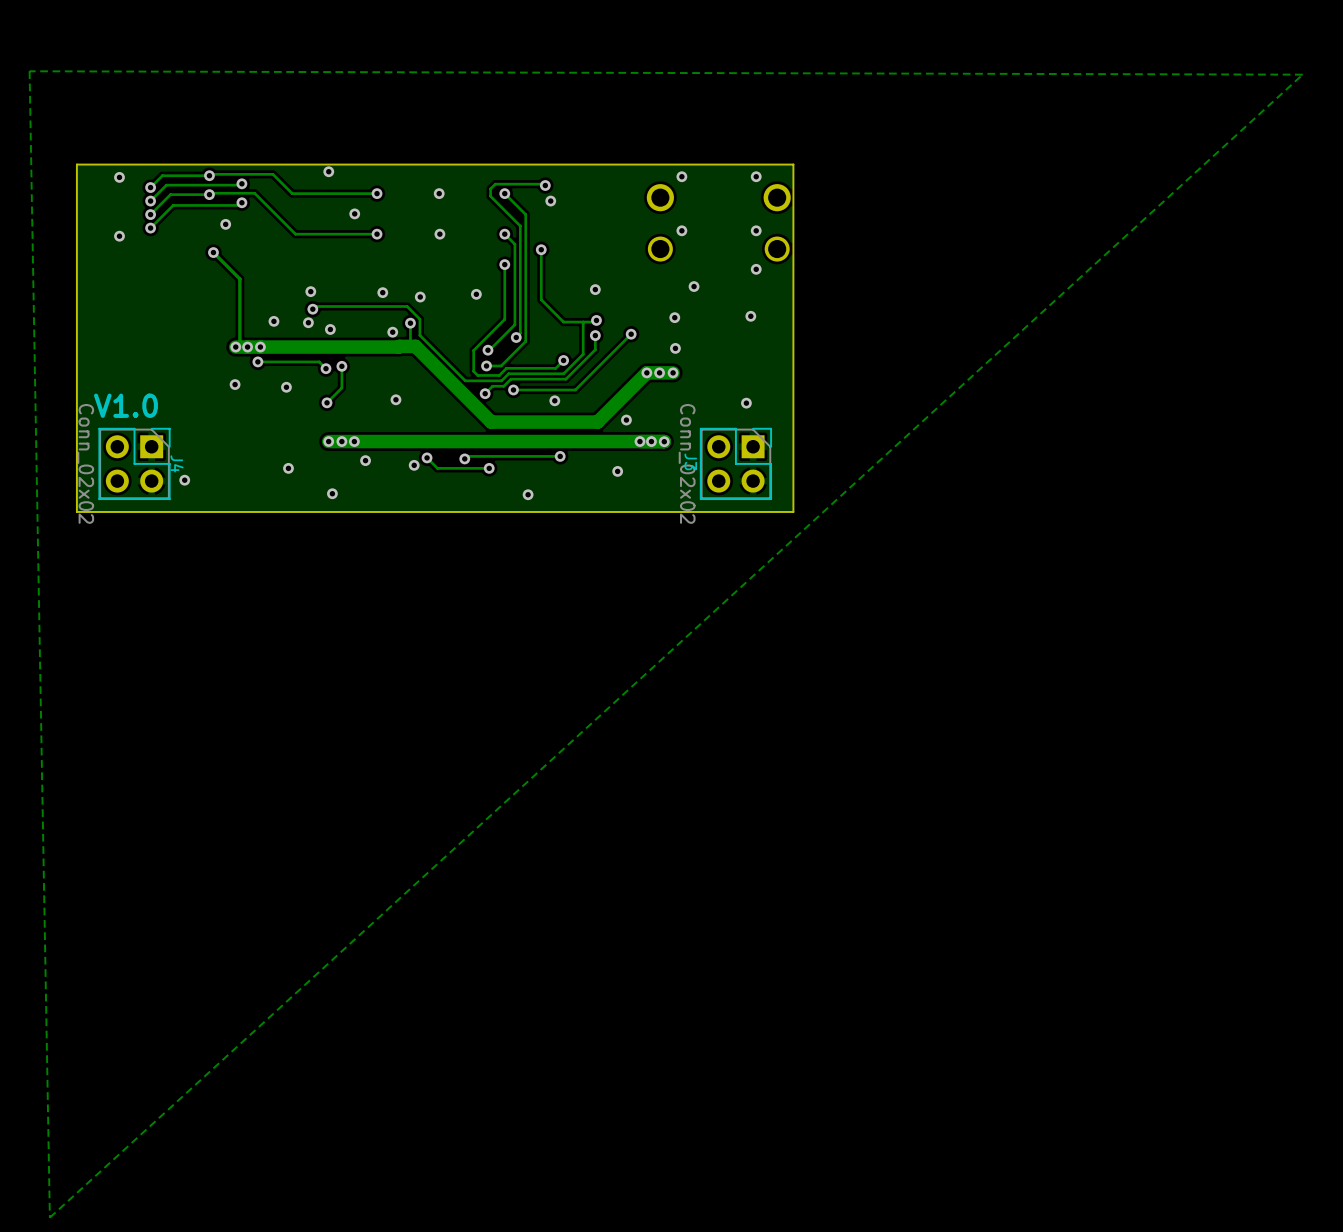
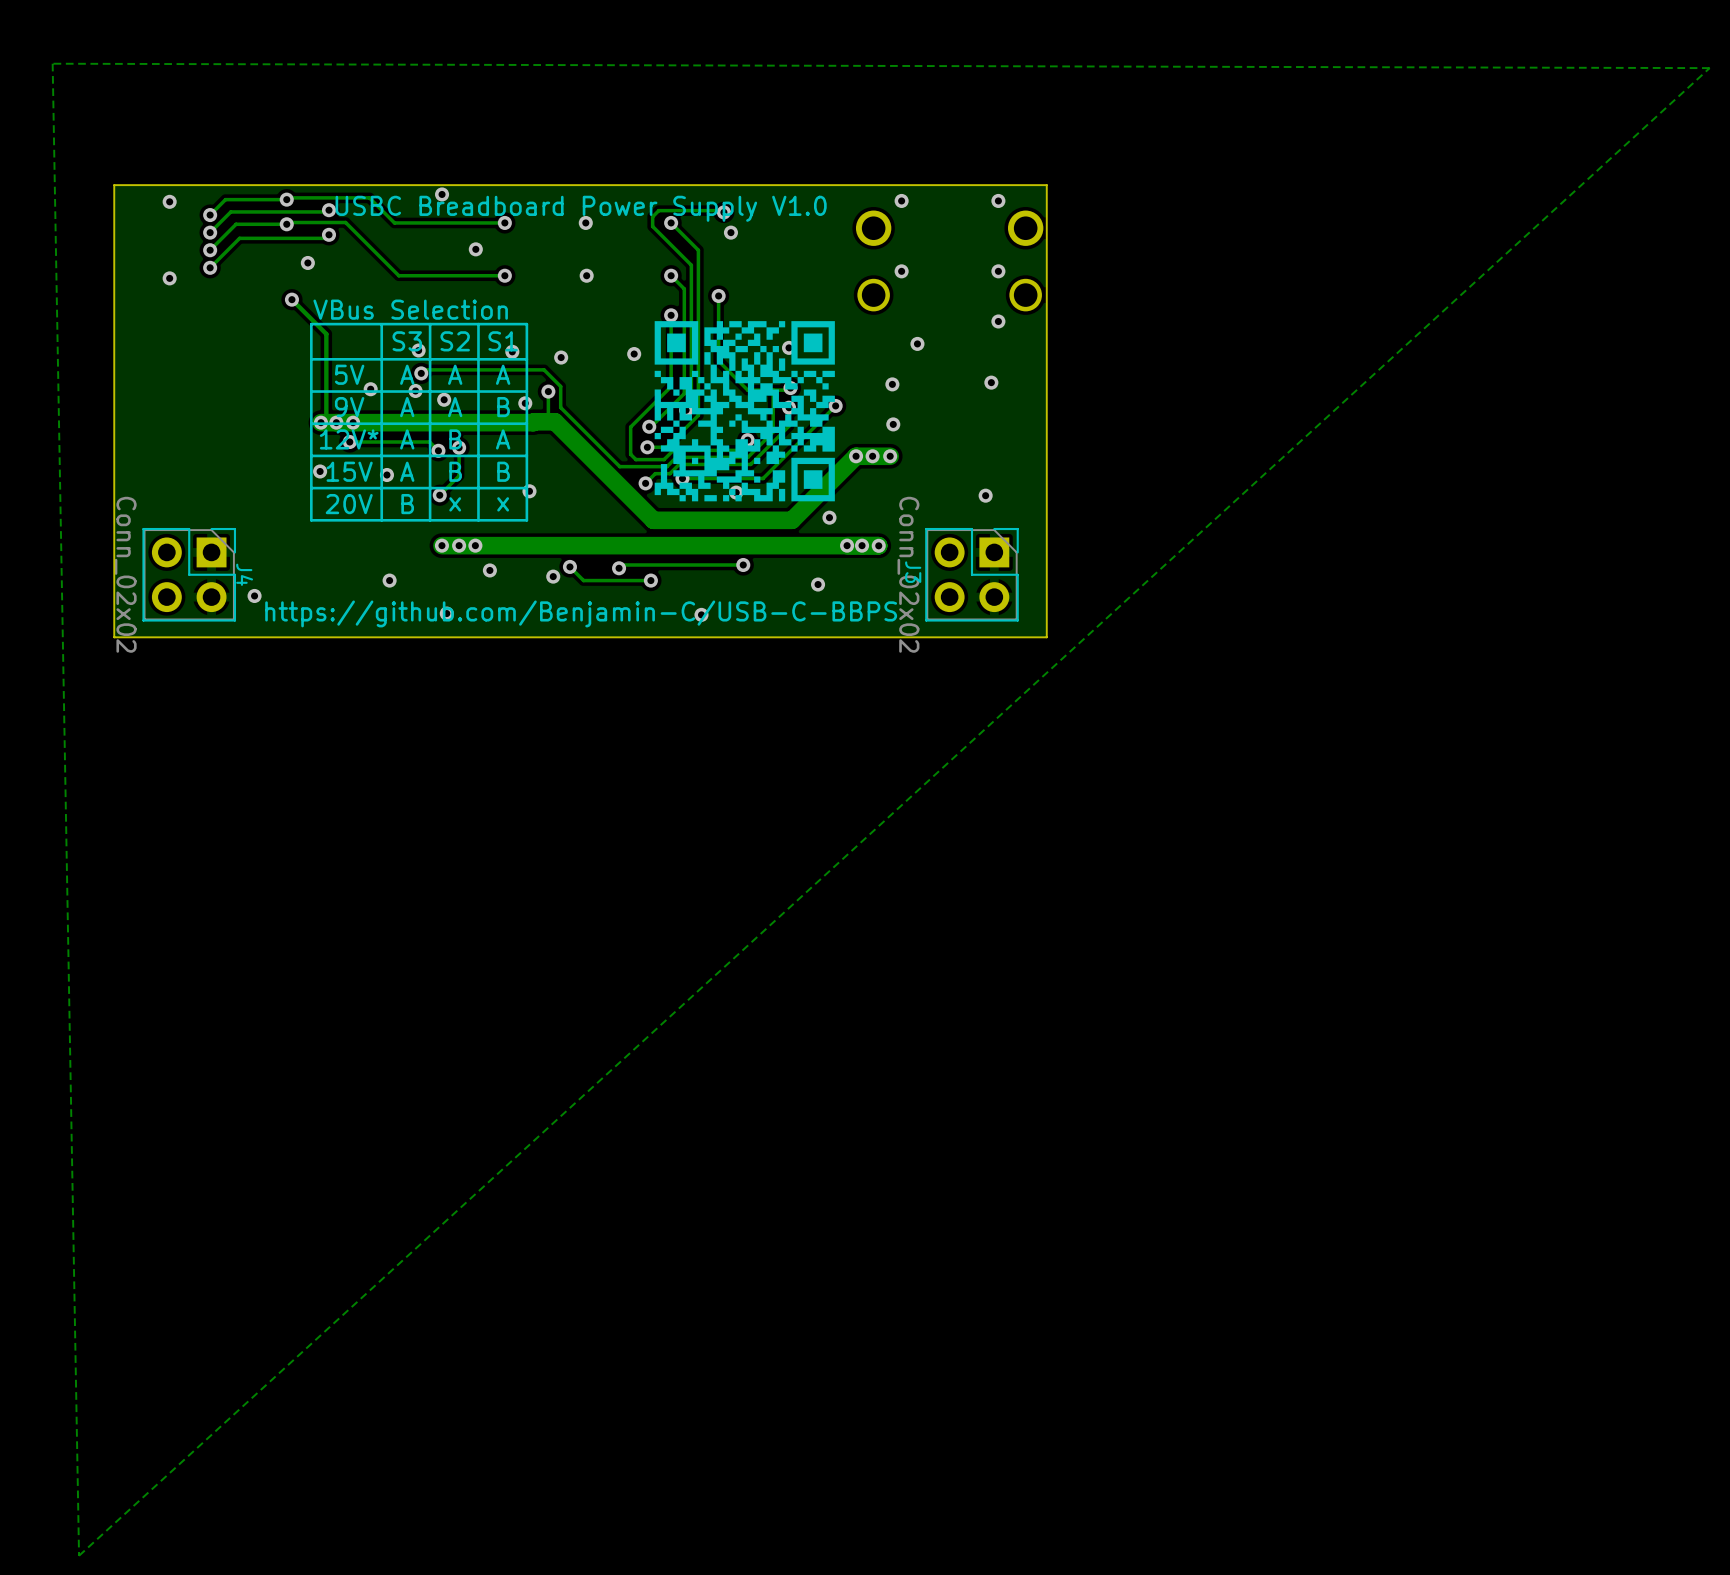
text: none -> USBC Breadboard Power Supply V1.0 (581, 208)
text: none -> VBus Selection (410, 309)
drawing: none -> [654, 321, 835, 502]
line: none -> (430, 324) (430, 520)
line: none -> (478, 324) (478, 520)
line: none -> (526, 324) (311, 324) (311, 520) (526, 520) (526, 324)
line: none -> (381, 325) (381, 520)
text: none -> S3 (407, 341)
text: none -> S2 (455, 341)
text: none -> S1 (503, 341)
line: none -> (526, 359) (311, 359)
text: none -> 5V (349, 374)
text: none -> A (407, 374)
text: none -> A (455, 374)
text: none -> A (503, 374)
line: none -> (526, 391) (311, 391)
text: none -> 9V (349, 407)
text: none -> A (407, 407)
text: none -> A (455, 407)
text: none -> B (503, 407)
line: none -> (526, 423) (311, 423)
text: none -> 12V* (349, 439)
text: none -> A (407, 439)
text: none -> B (455, 439)
text: none -> A (503, 439)
line: none -> (526, 455) (311, 455)
text: none -> 15V (349, 471)
text: none -> A (407, 471)
text: none -> B (455, 471)
text: none -> B (503, 471)
line: none -> (526, 488) (311, 488)
text: V1.0 (125, 405) -> none
text: none -> 20V (349, 504)
text: none -> B (407, 504)
text: none -> x (455, 504)
text: none -> x (503, 504)
text: none -> https://github.com/Benjamin-C/USB-C-BBPS (581, 613)

